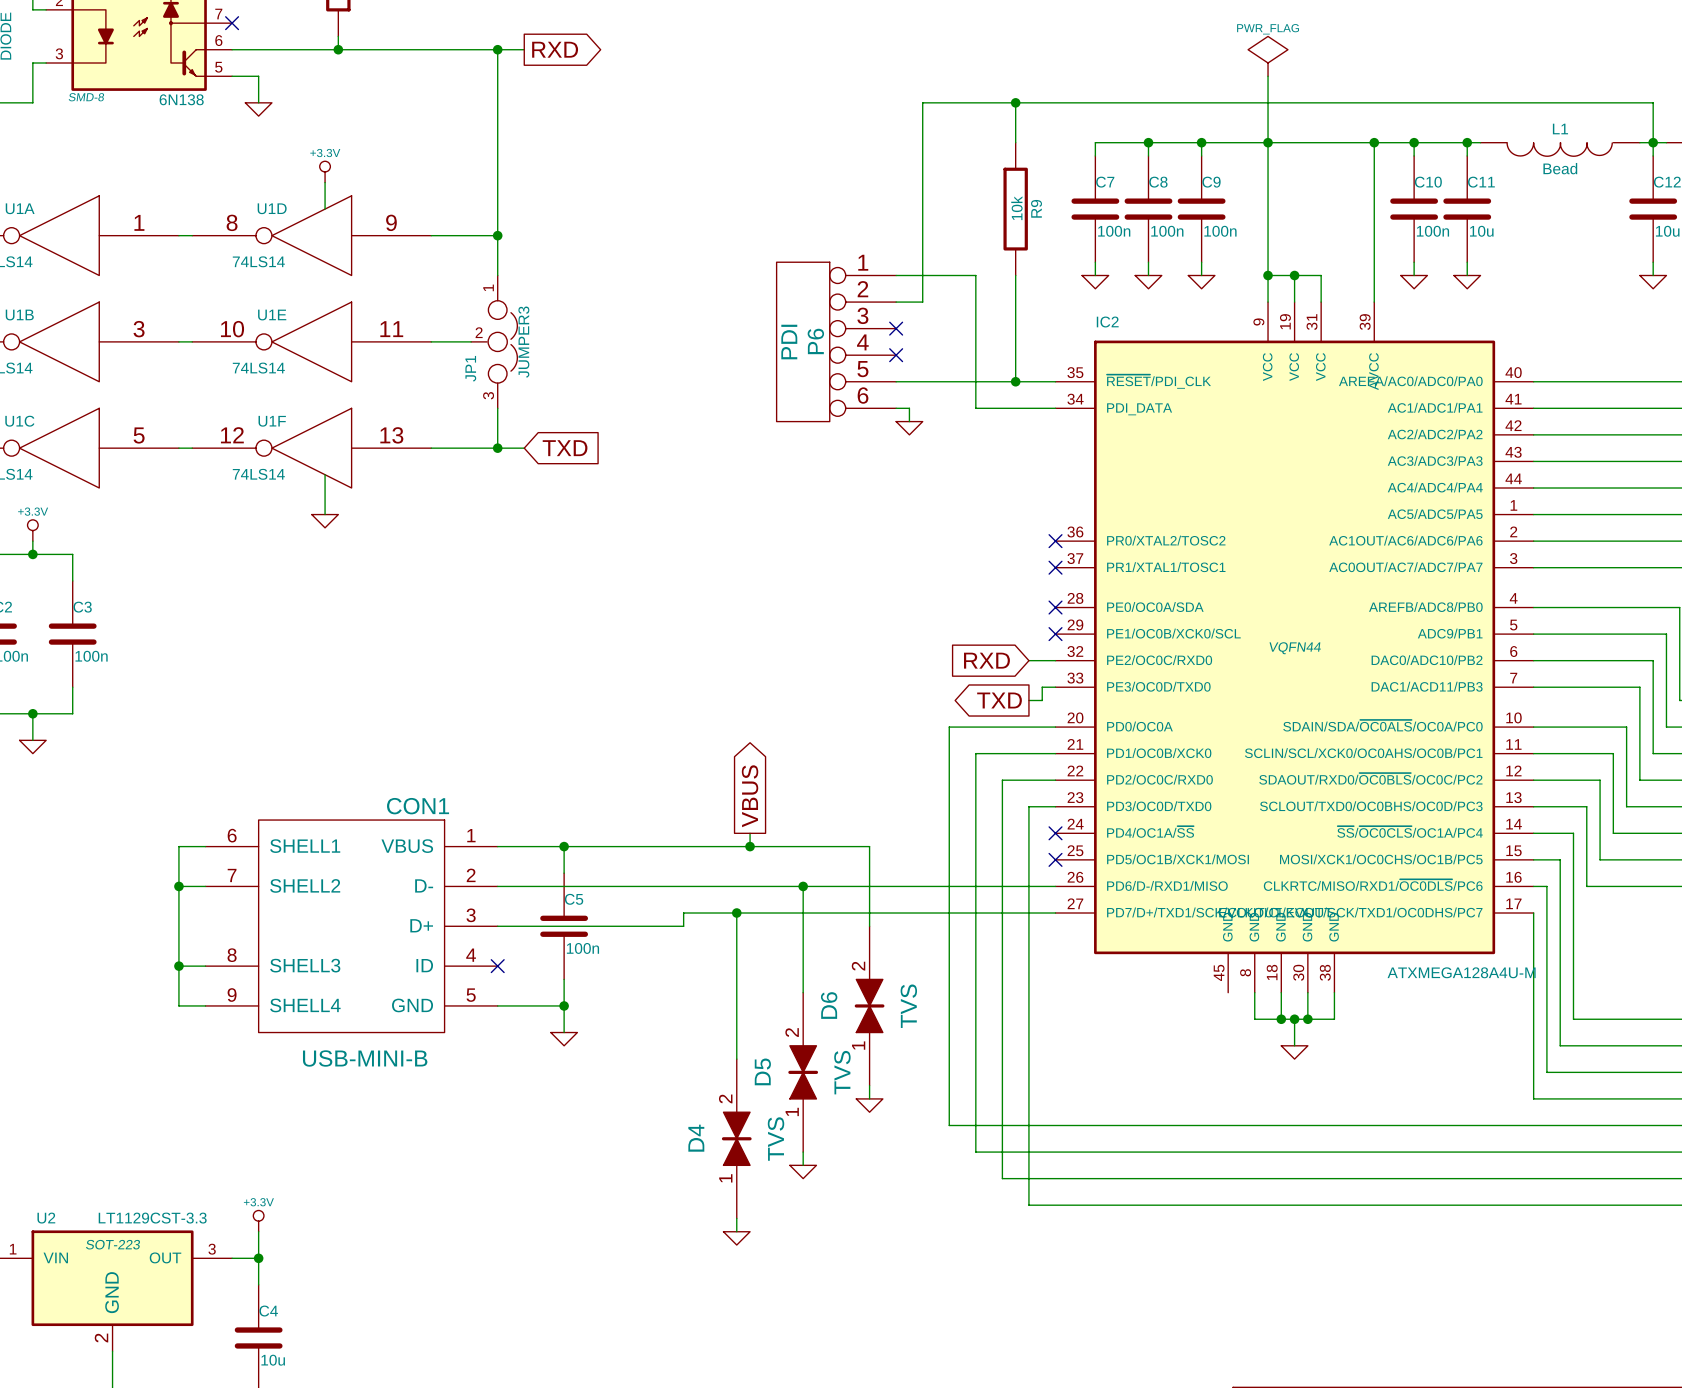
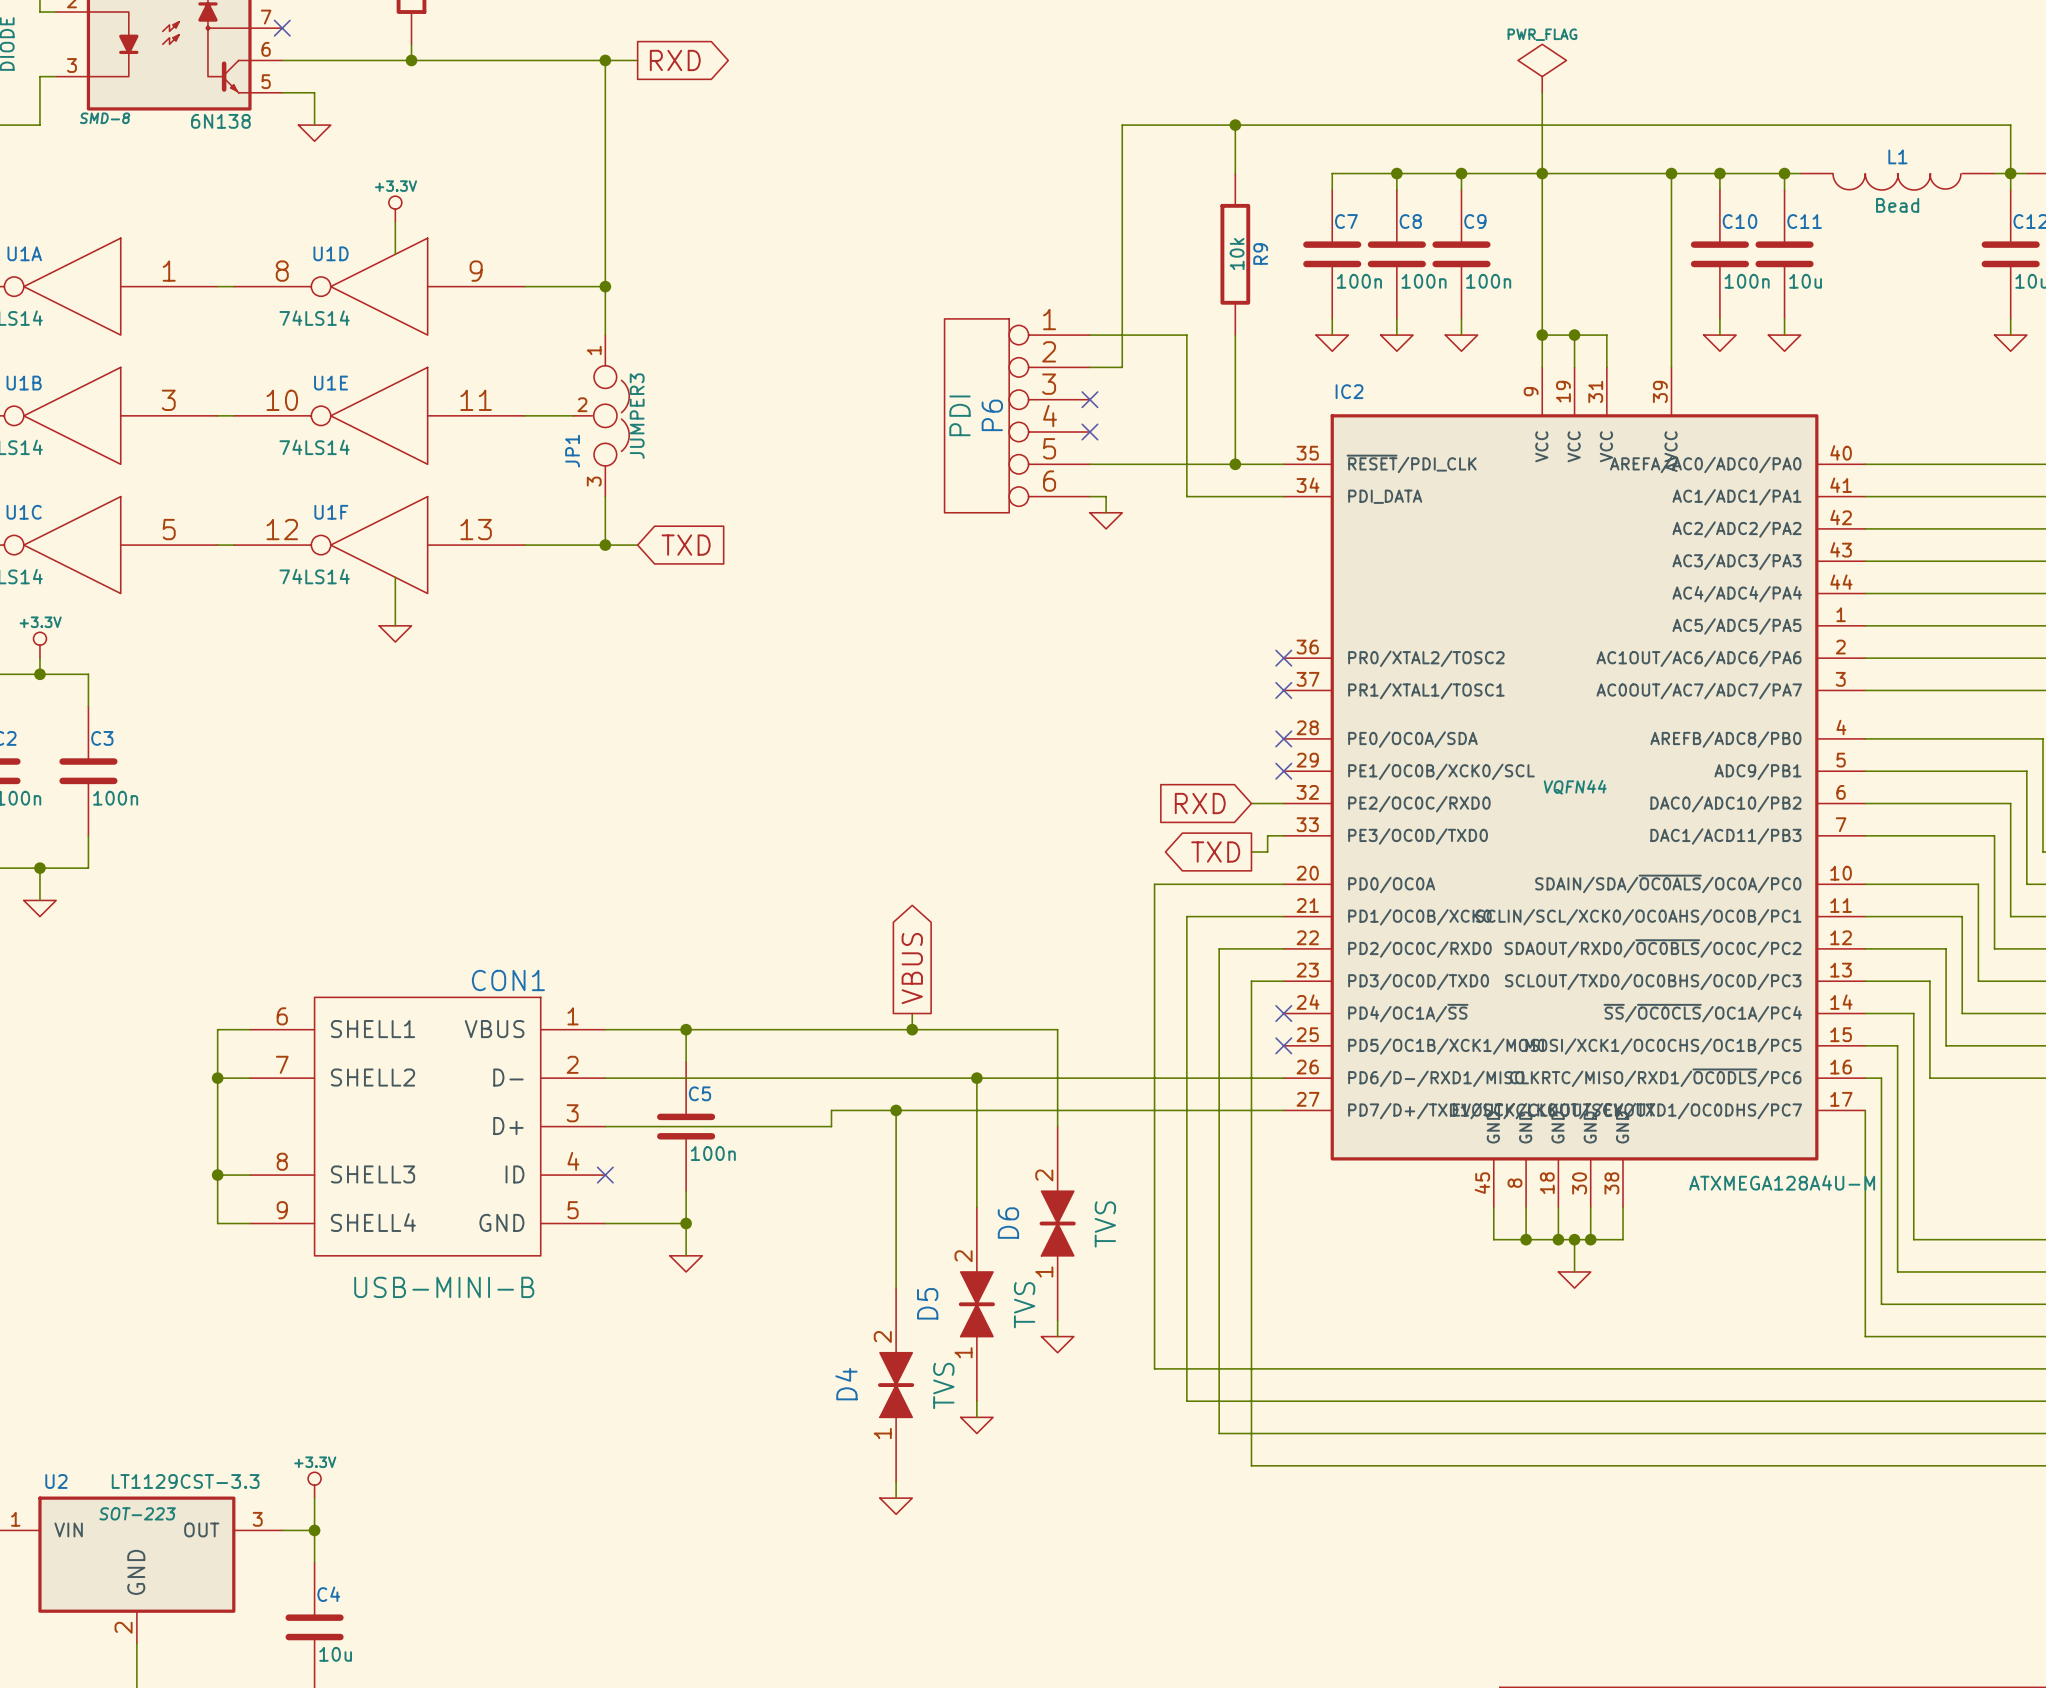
wire: none -> (1493, 1207) (1493, 1239) (1526, 1239)
junction: none -> (1526, 1239)

